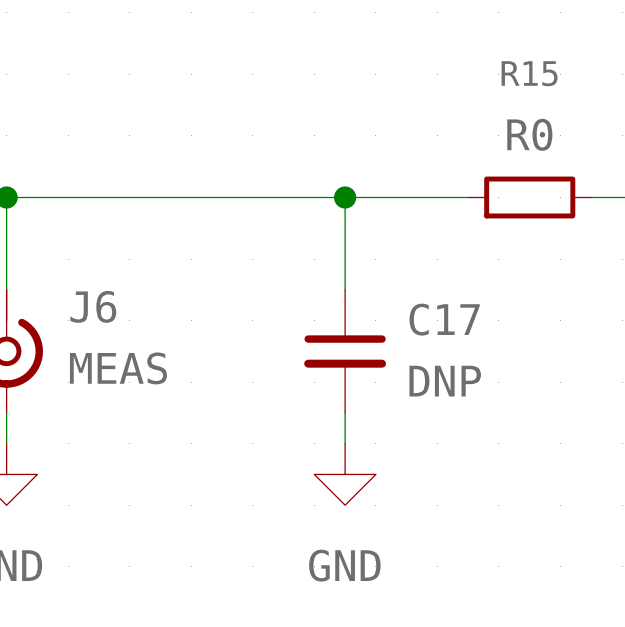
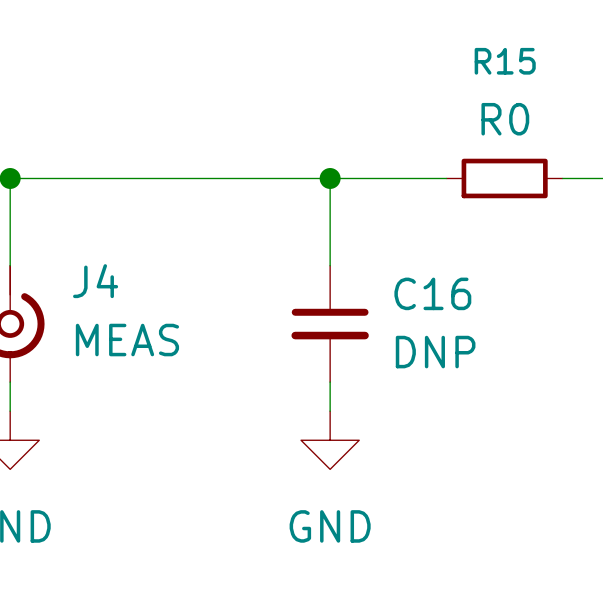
J6 name: J6 (93, 306) -> J4 (95, 281)
C17 name: C17 (444, 319) -> C16 (432, 293)

